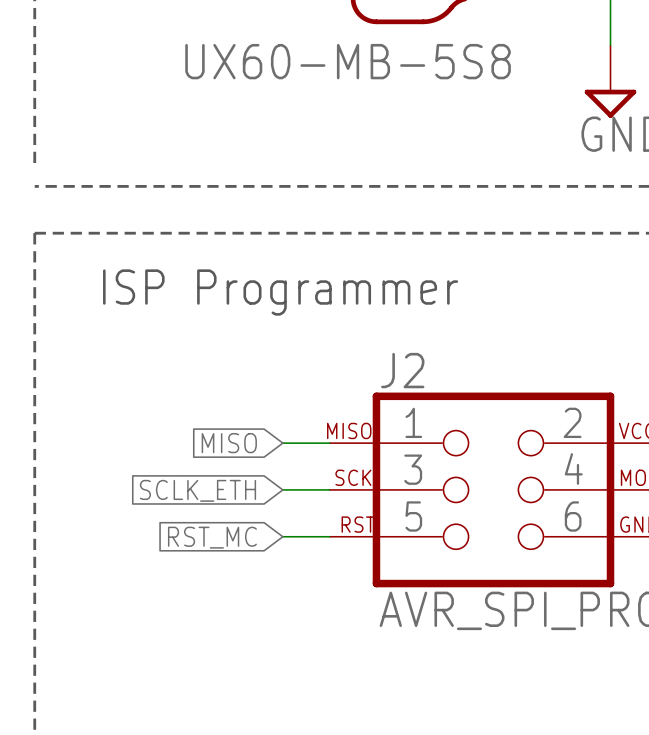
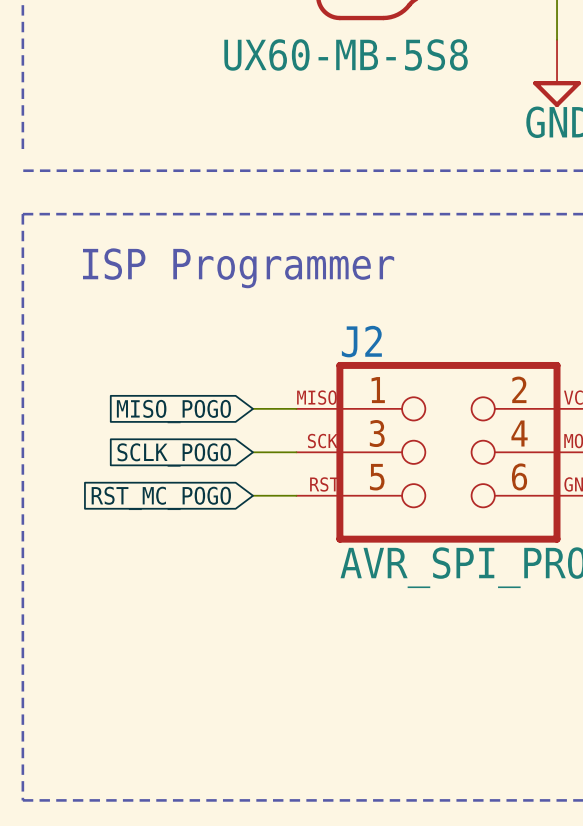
global label: MISO (229, 443) -> MISO_POGO (173, 411)
global label: SCLK_ETH (197, 490) -> SCLK_POGO (174, 454)
global label: RST_MC (212, 537) -> RST_MC_POGO (161, 498)

